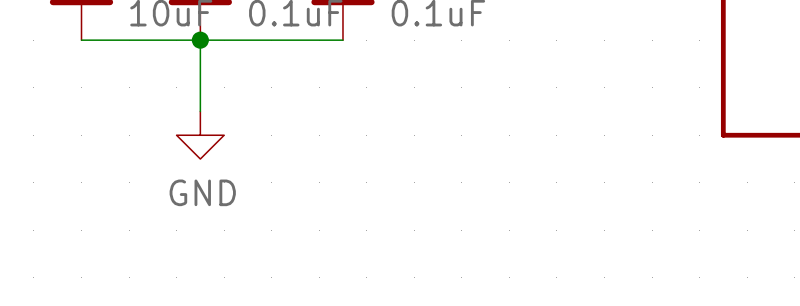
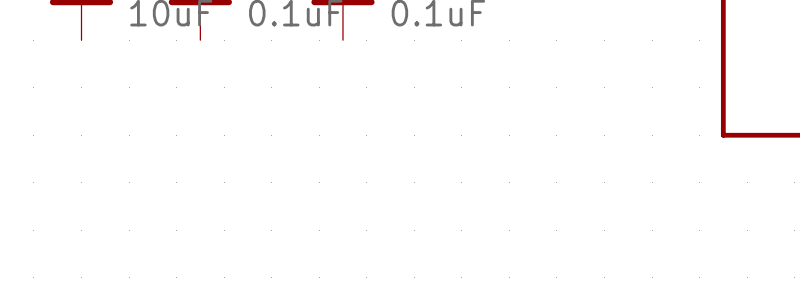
wire: (81, 40) (342, 40) -> none
wire: (200, 40) (200, 111) -> none
junction: (200, 40) -> none
power symbol: GND (200, 135) -> none

